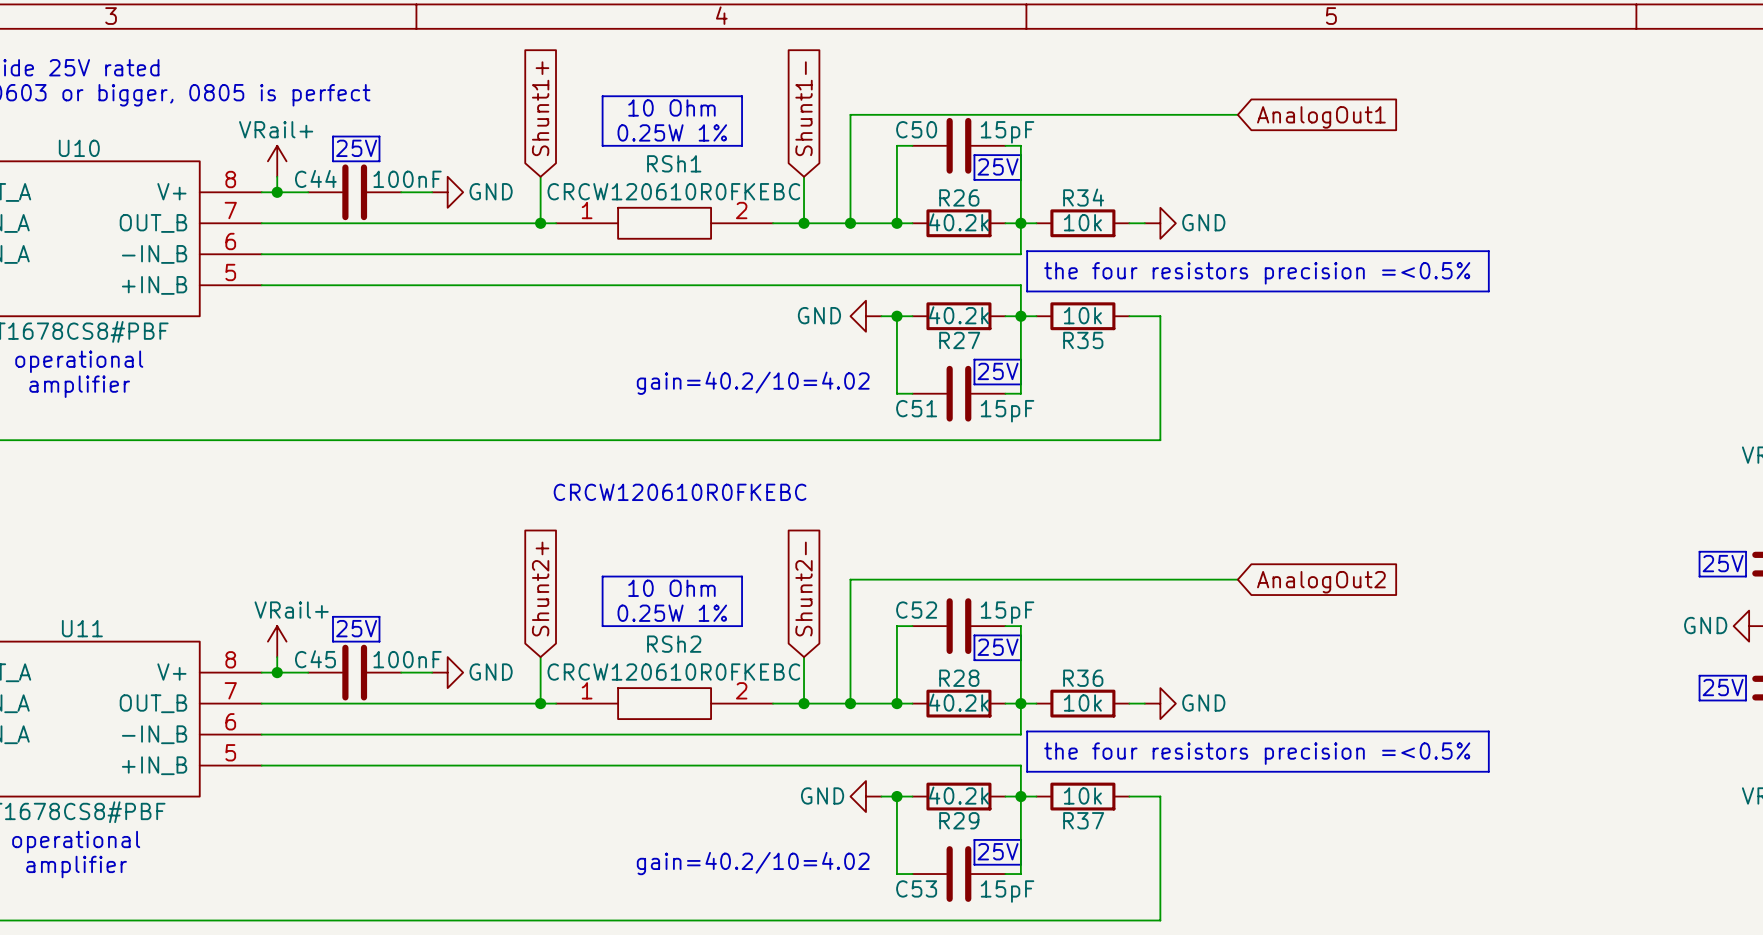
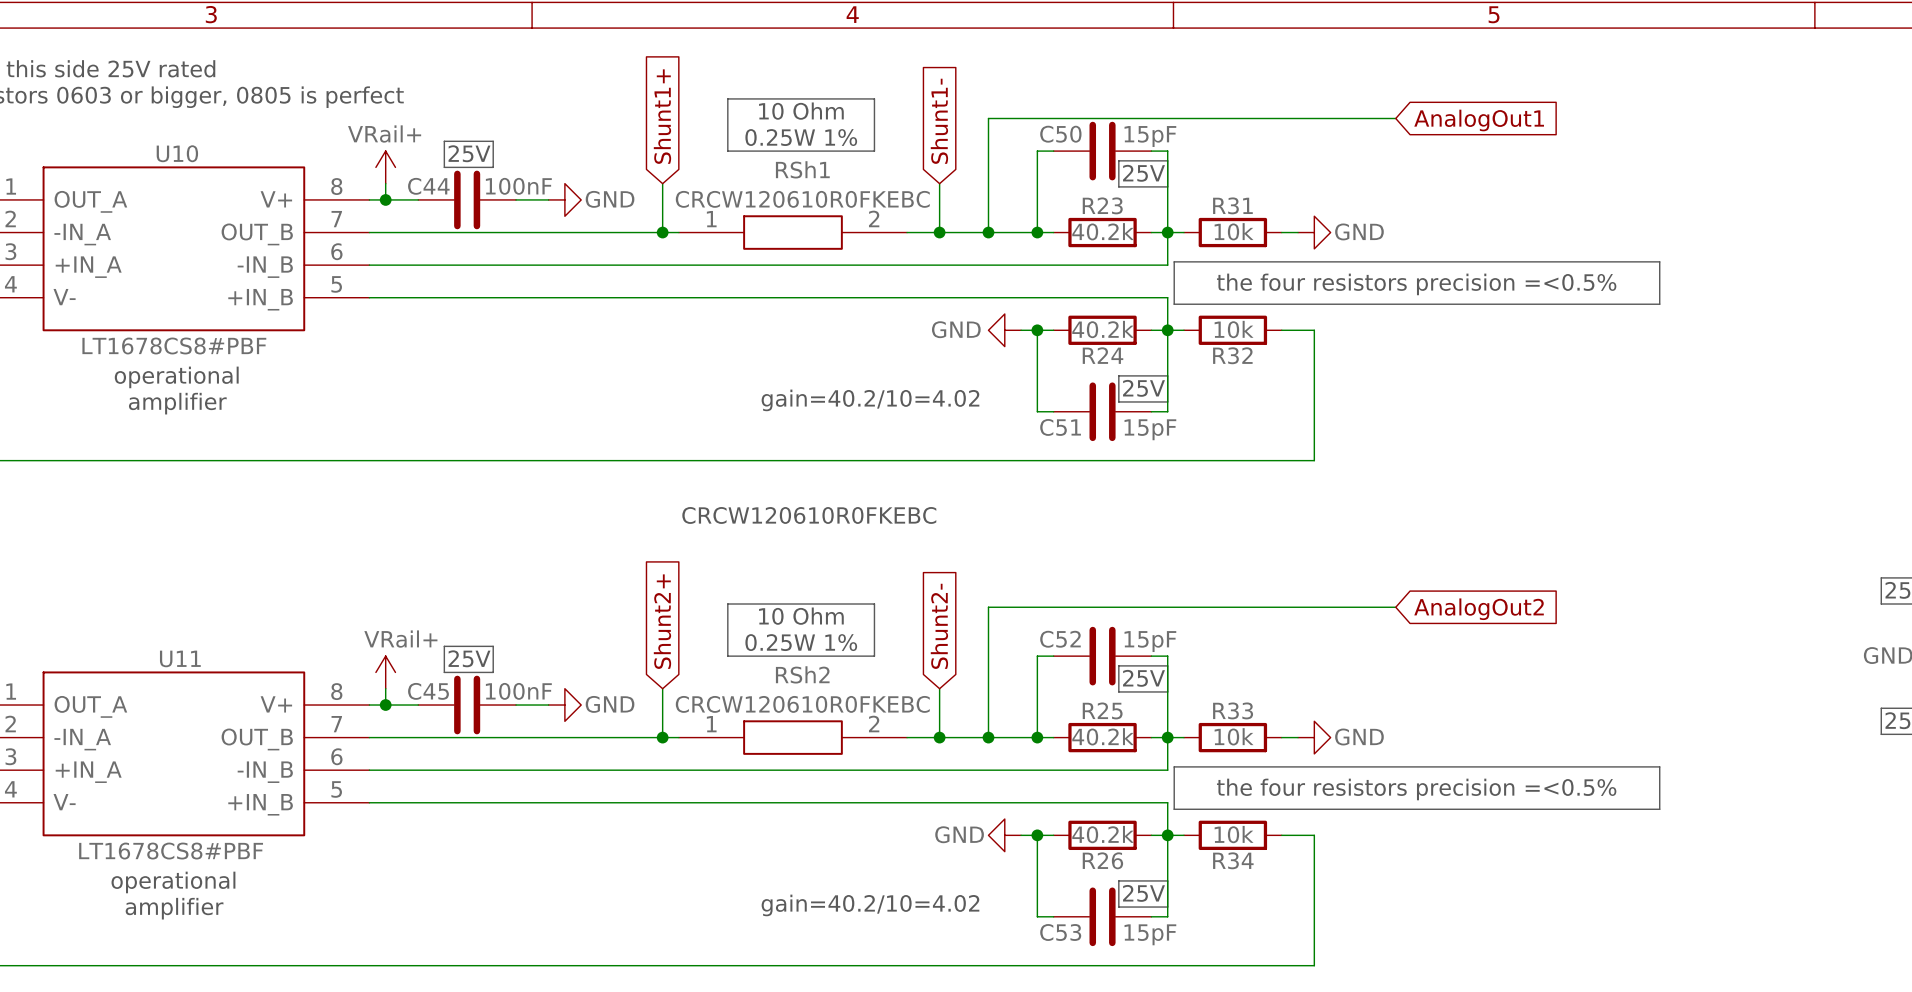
R26 name: R26 (959, 197) -> R23 (1102, 205)
R34 name: R34 (1083, 197) -> R31 (1232, 205)
R27 name: R27 (959, 340) -> R24 (1103, 355)
R35 name: R35 (1083, 340) -> R32 (1232, 355)
R28 name: R28 (959, 678) -> R25 (1102, 710)
R36 name: R36 (1083, 678) -> R33 (1233, 710)
R29 name: R29 (959, 820) -> R26 (1102, 860)
R37 name: R37 (1083, 820) -> R34 (1233, 860)

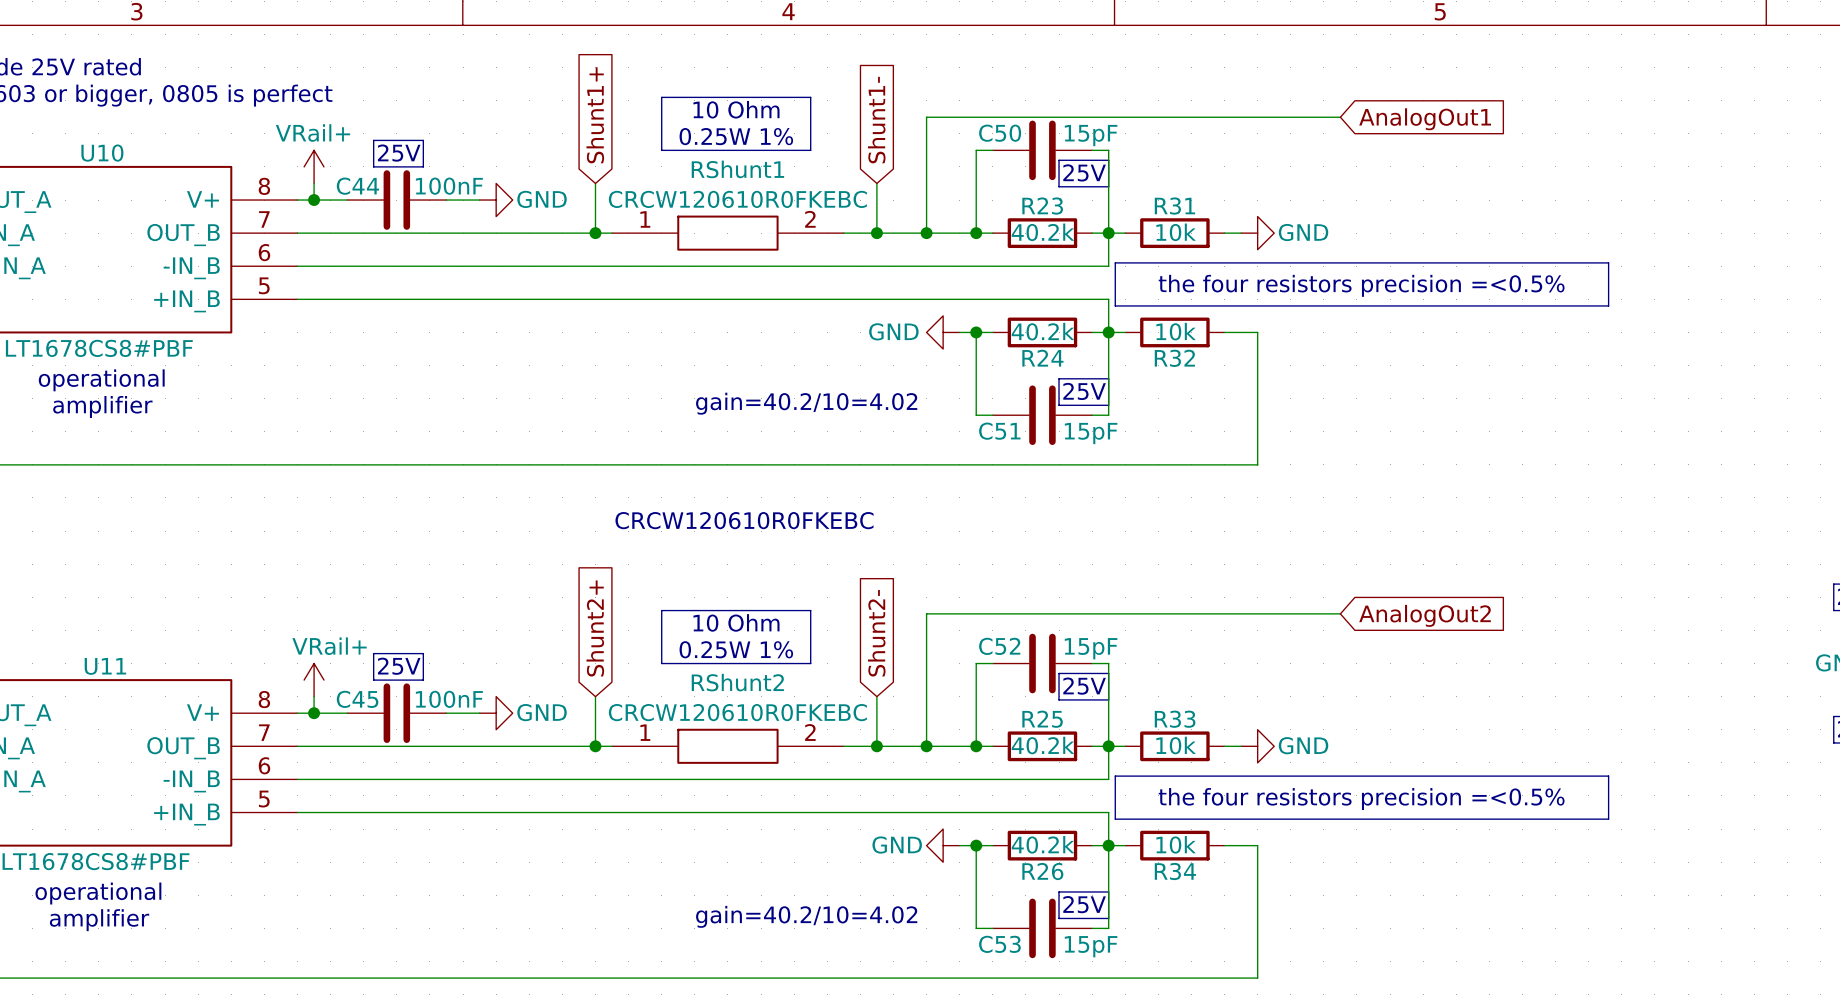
RSh1 name: RSh1 (802, 169) -> RShunt1 (737, 169)
RSh2 name: RSh2 (802, 674) -> RShunt2 (737, 682)

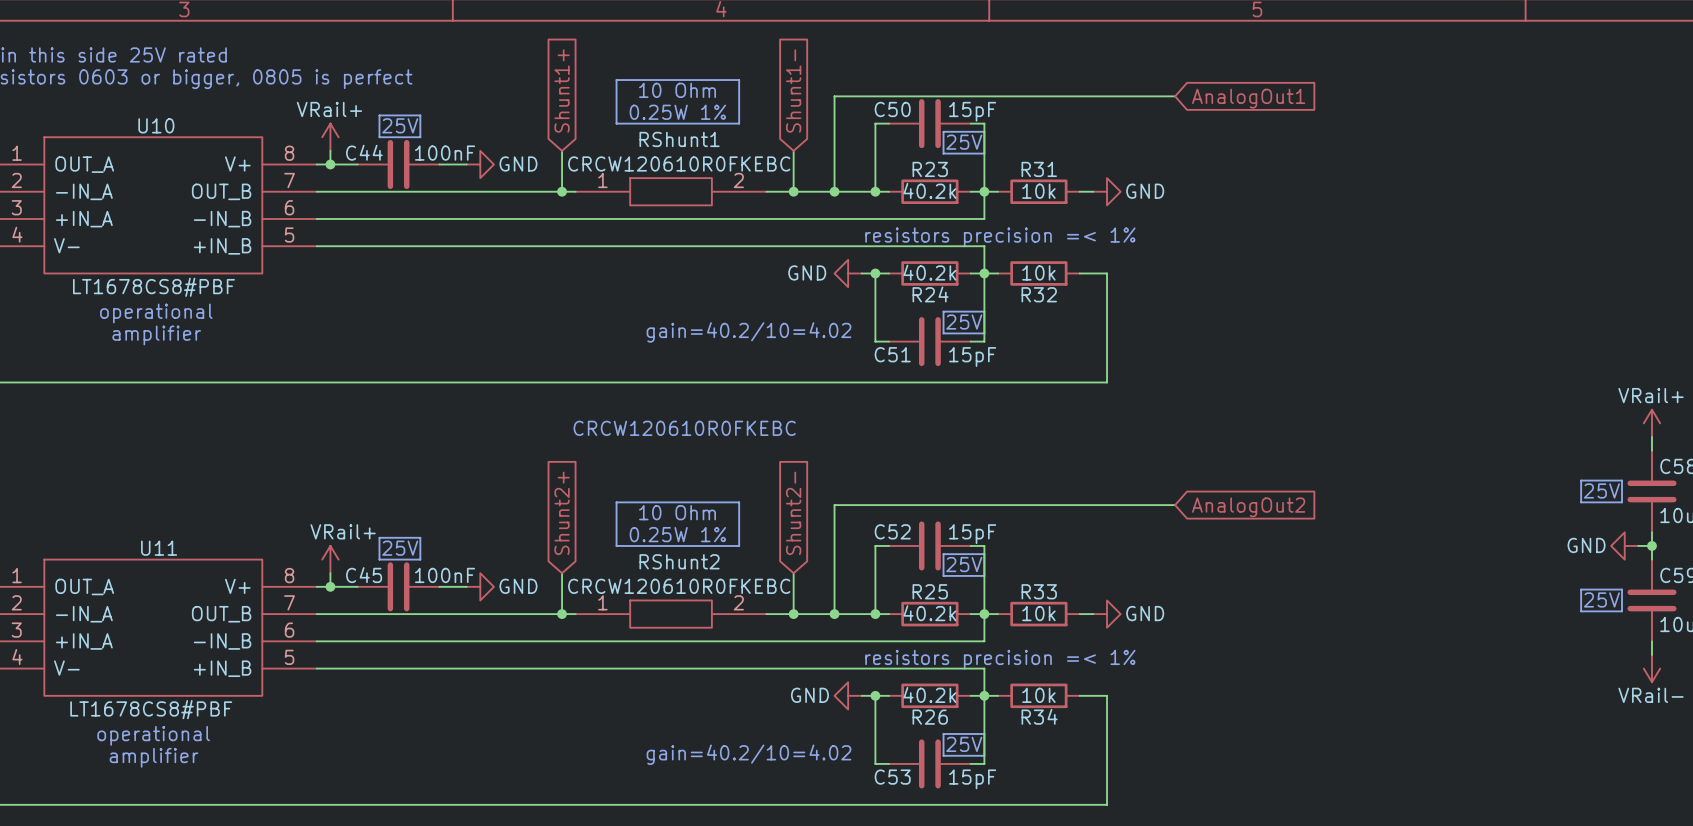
line: (1115, 262) (1608, 262) (1608, 305) (1115, 305) (1115, 262) -> none
text: the four resistors precision =<0.5% (1361, 285) -> none
text: none -> resistors precision =< 1% (1000, 237)
line: (1115, 776) (1115, 819) (1608, 819) (1608, 776) (1115, 776) -> none
text: the four resistors precision =<0.5% (1361, 799) -> none
text: none -> resistors precision =< 1% (1000, 659)

